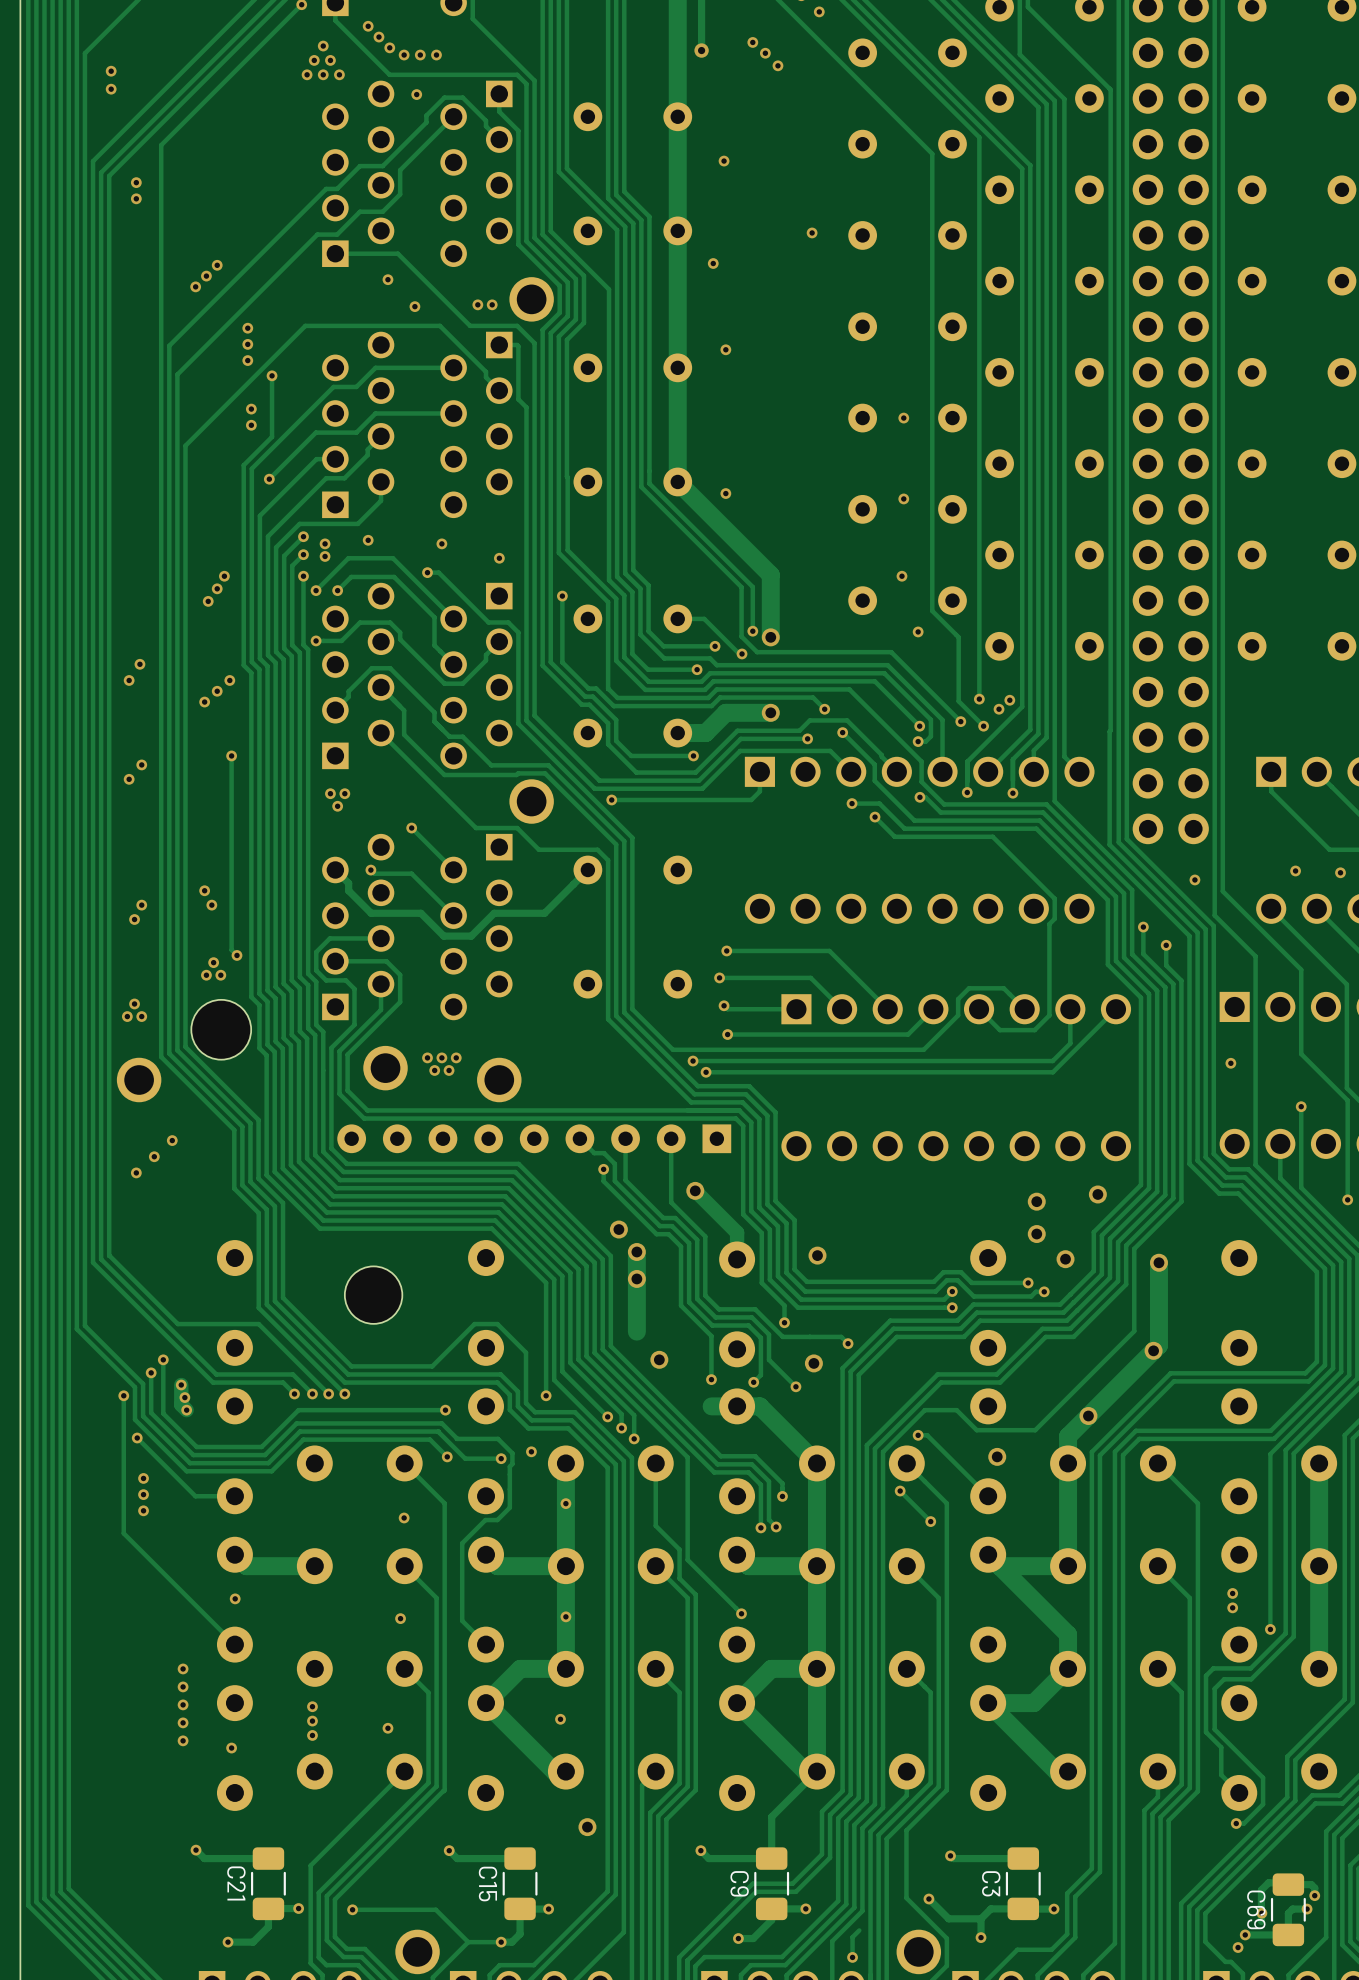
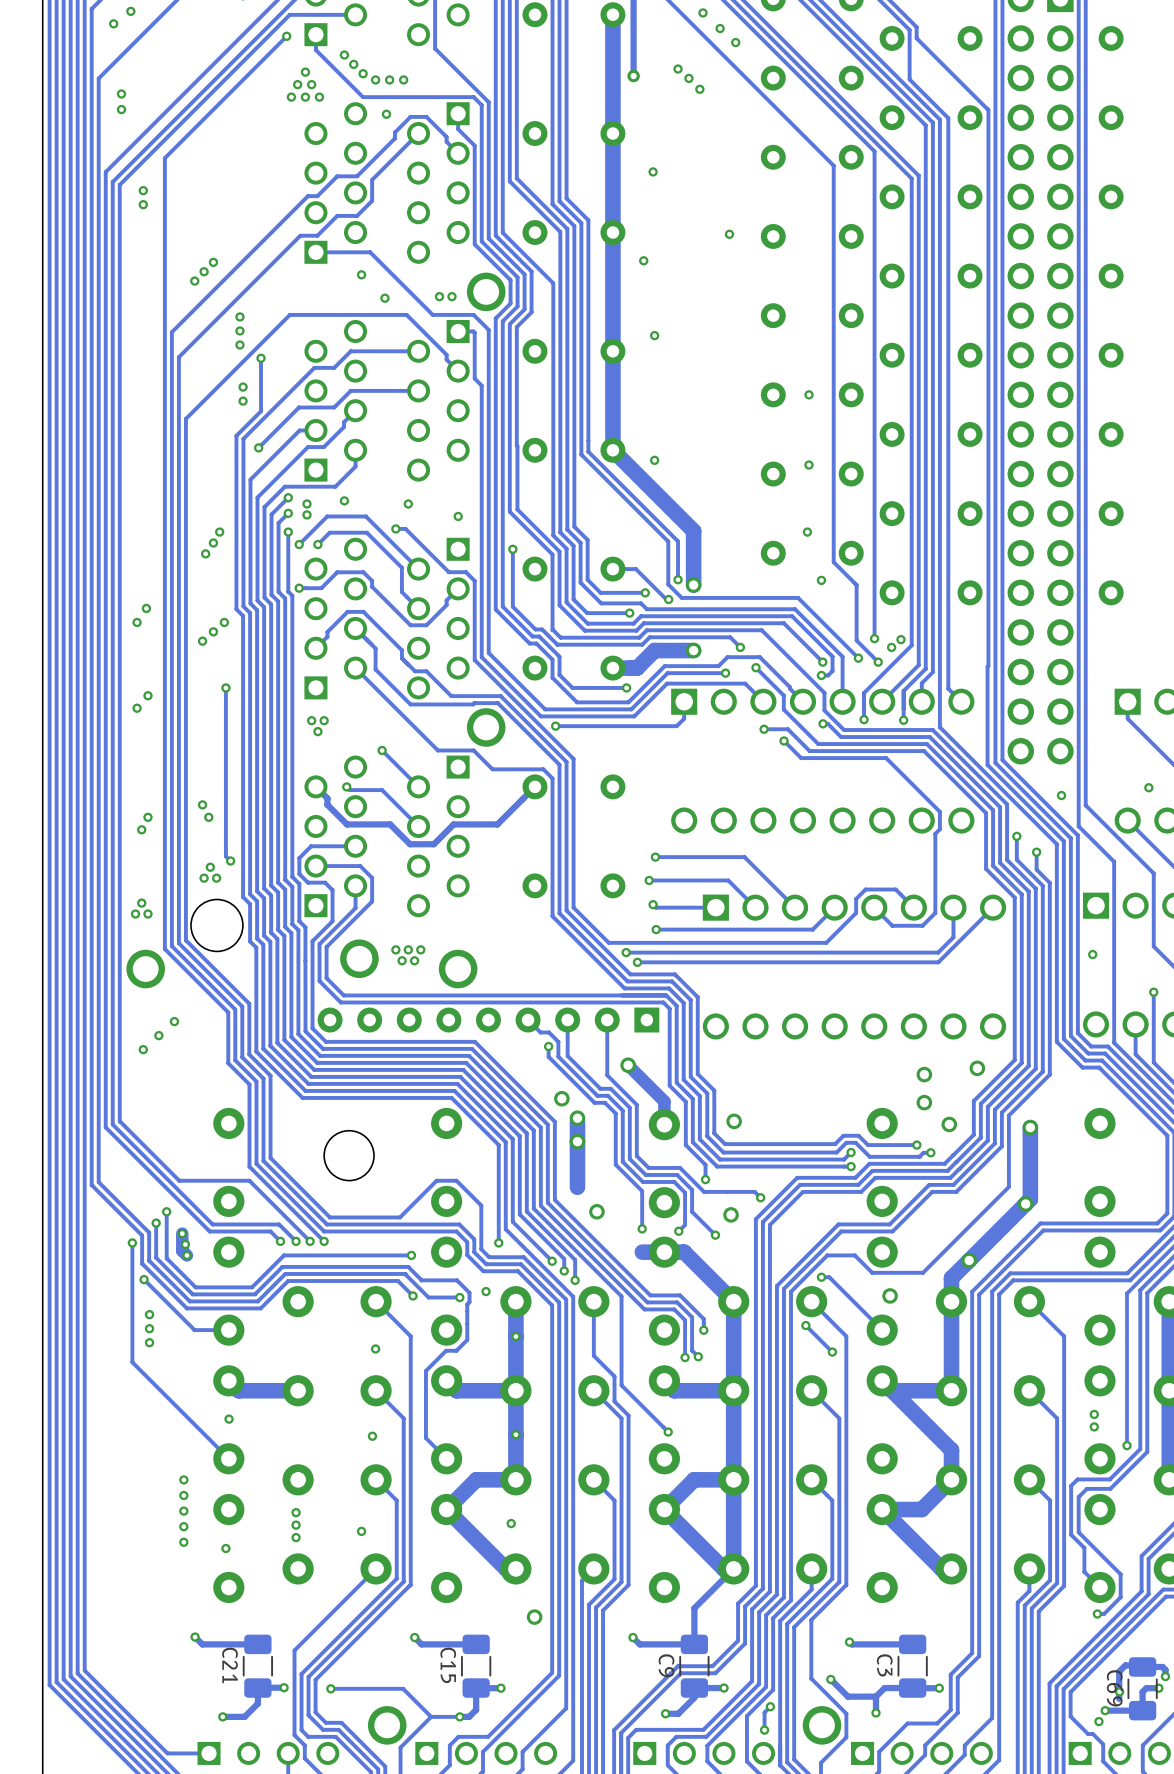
via: none -> (770, 1706)

